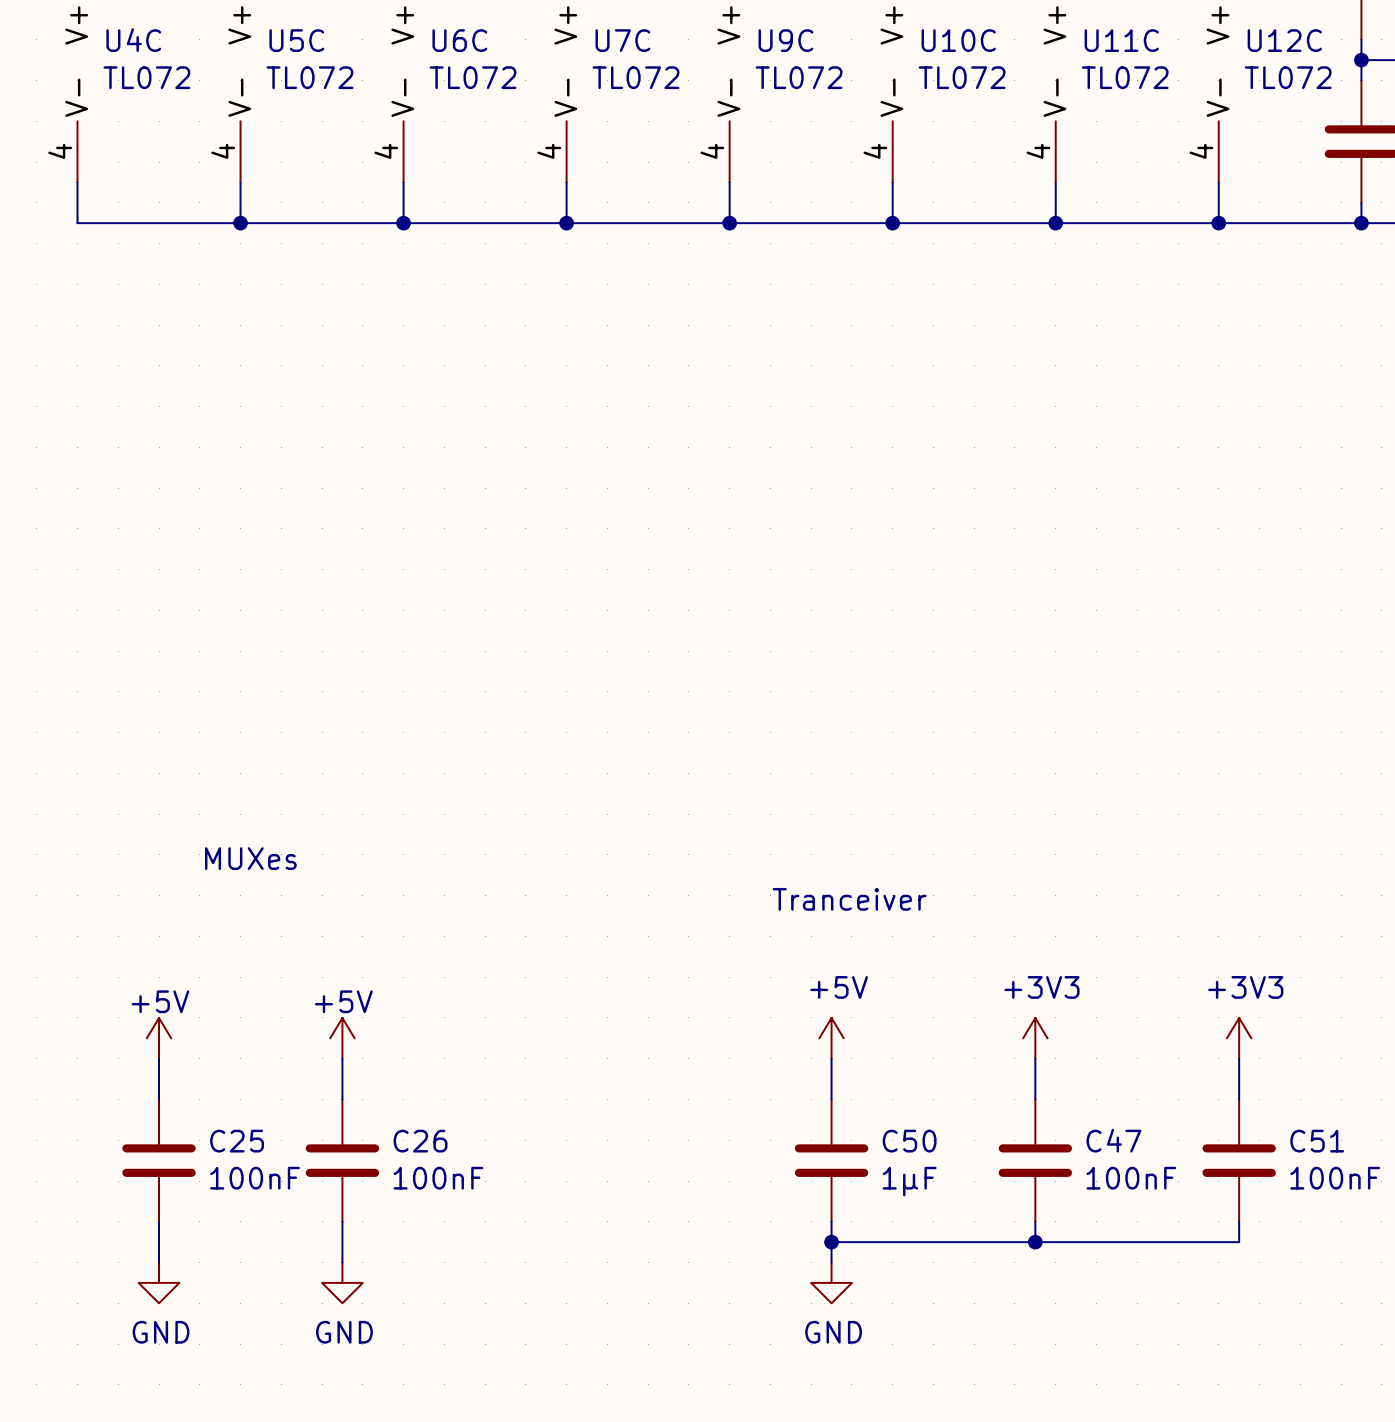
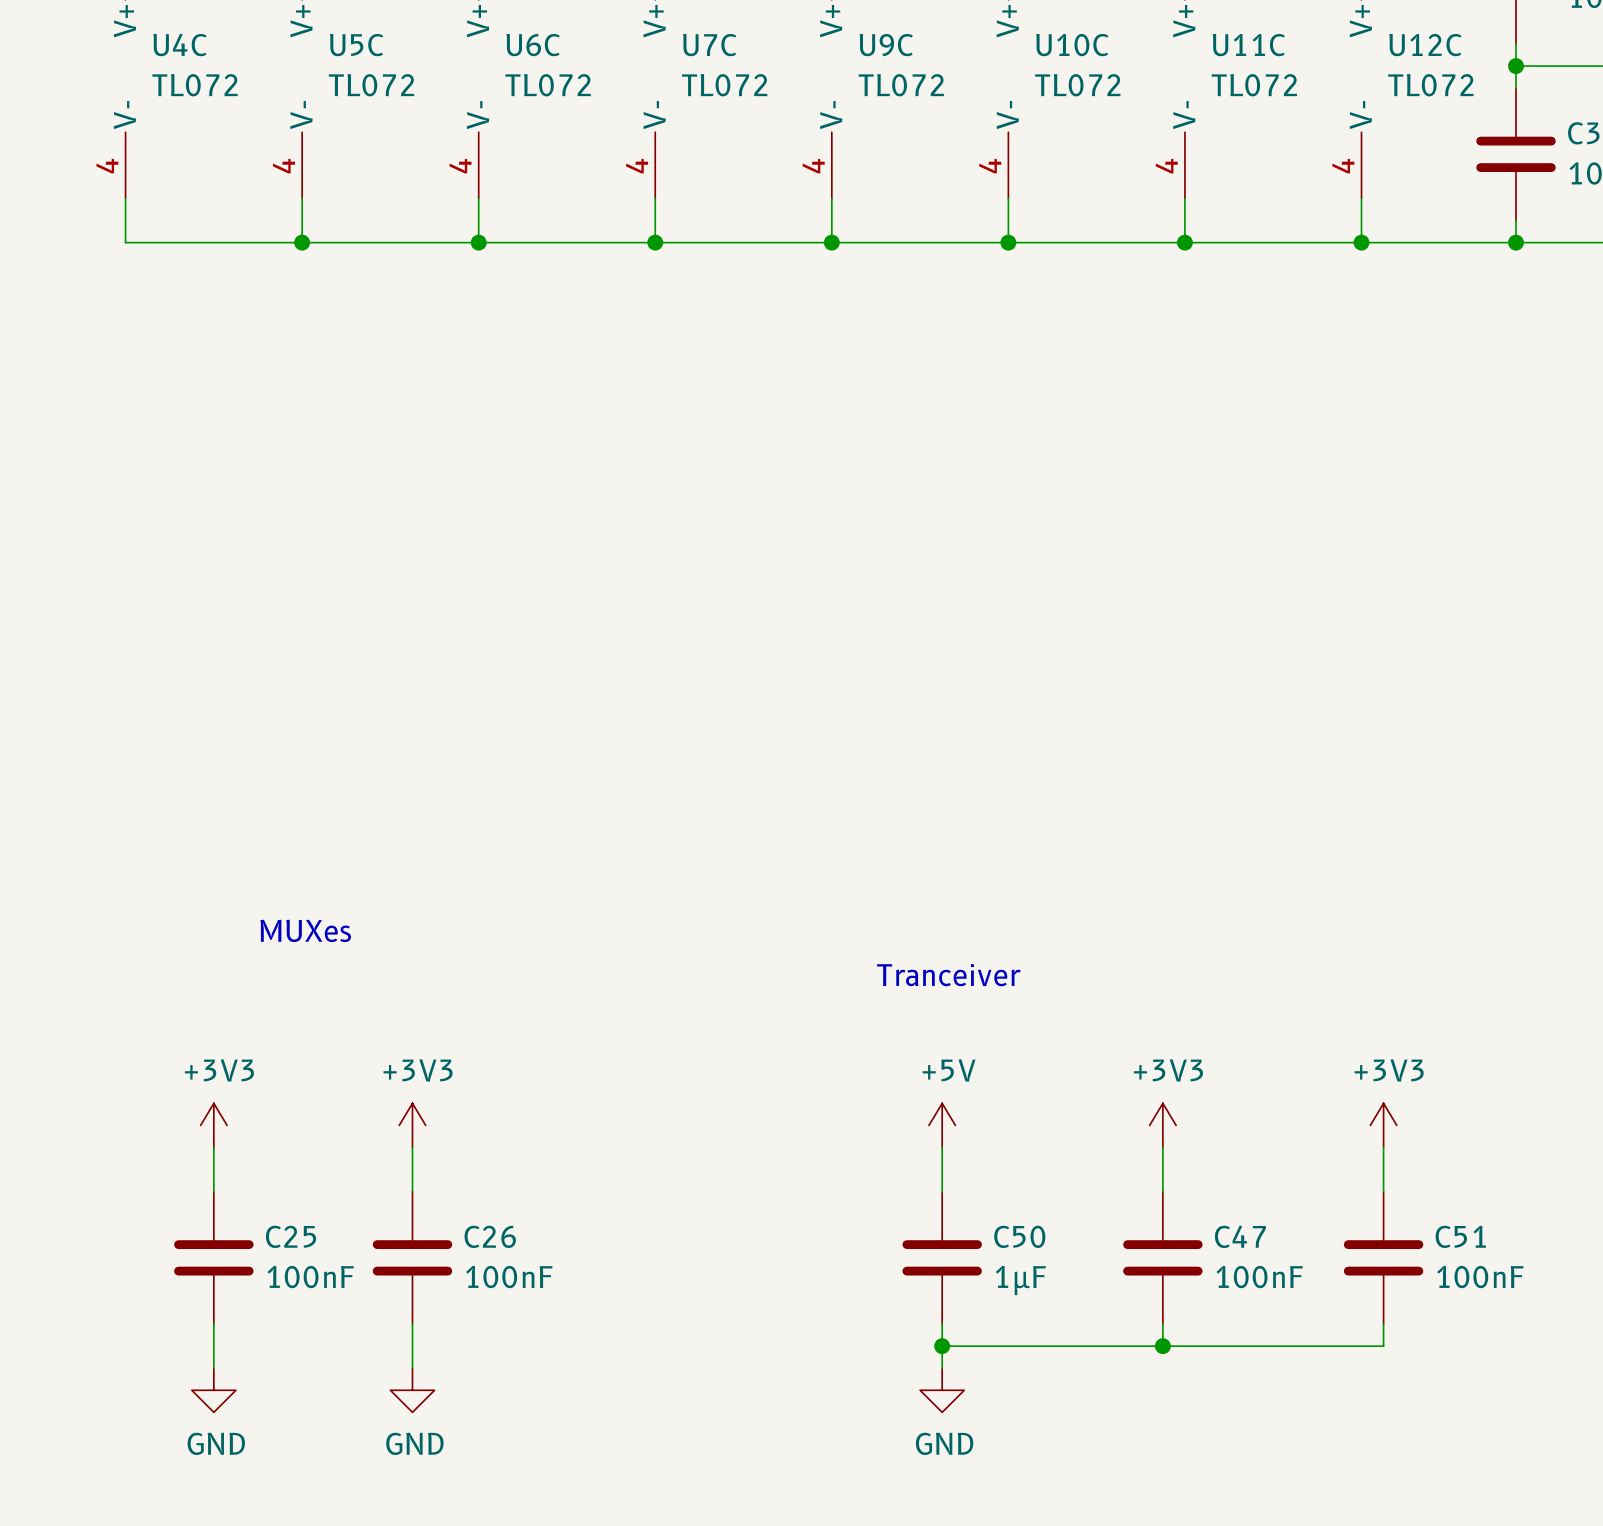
power symbol: +5V (159, 1038) -> +3V3 (213, 1125)
power symbol: +5V (342, 1038) -> +3V3 (412, 1125)

